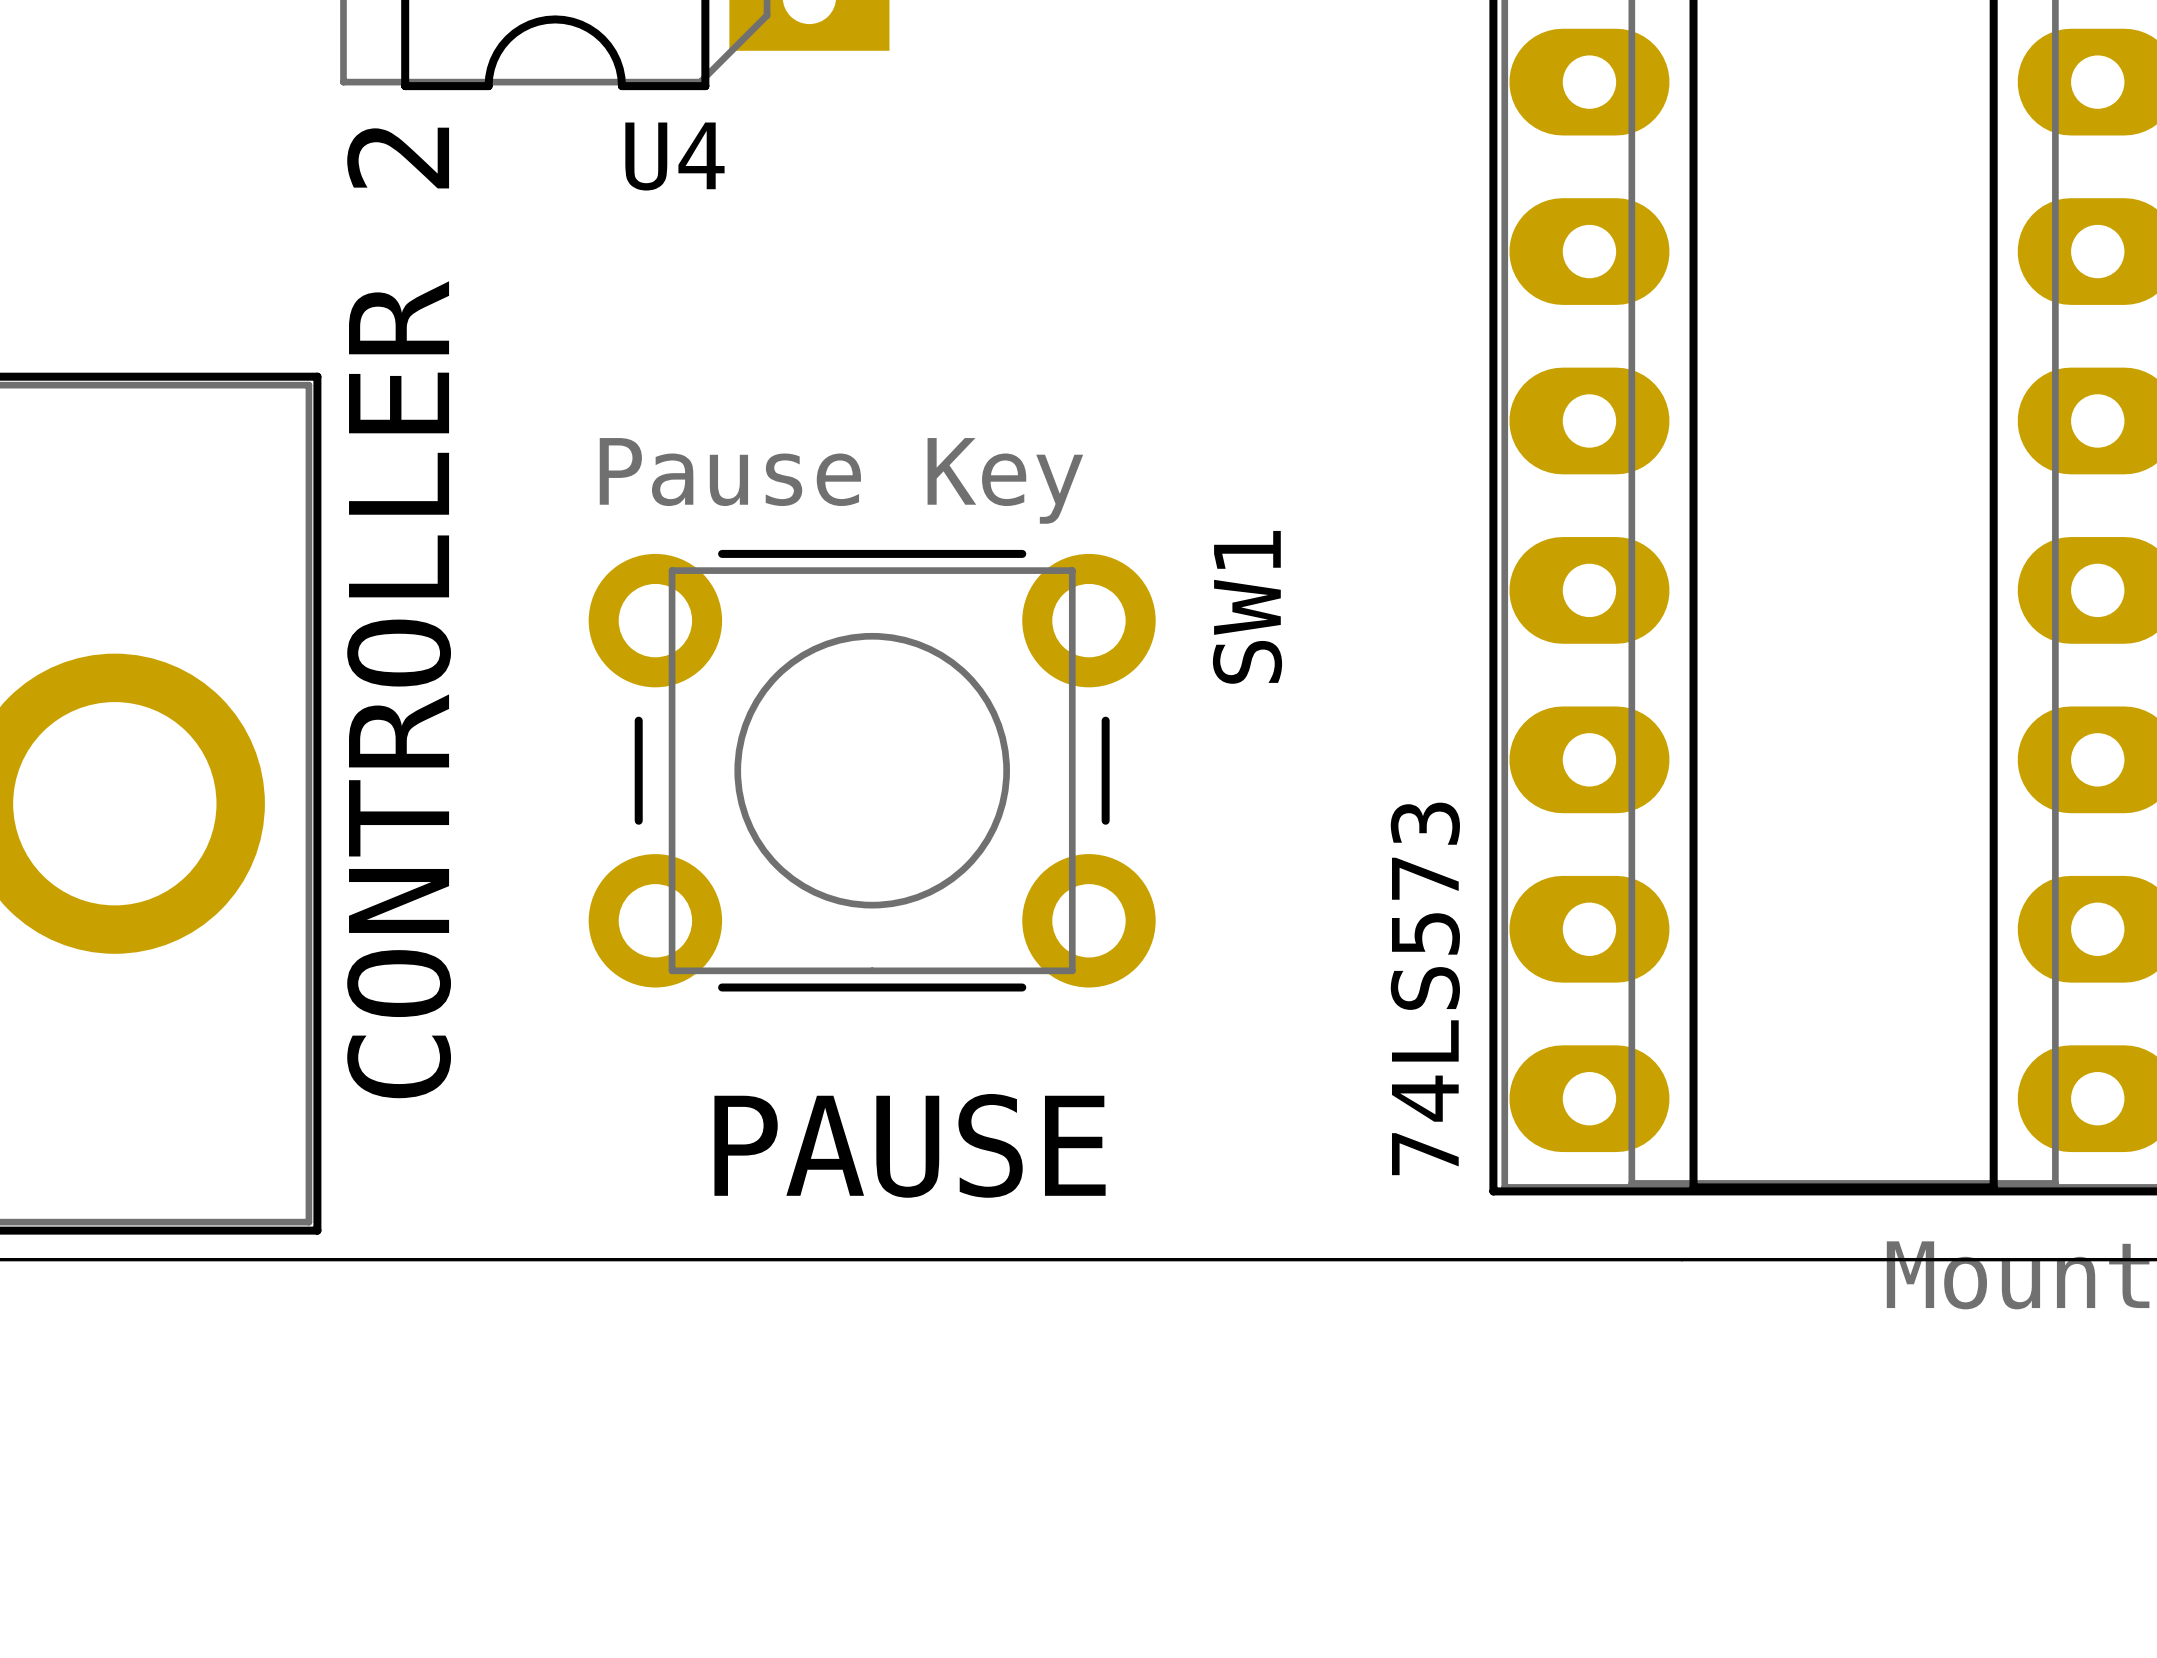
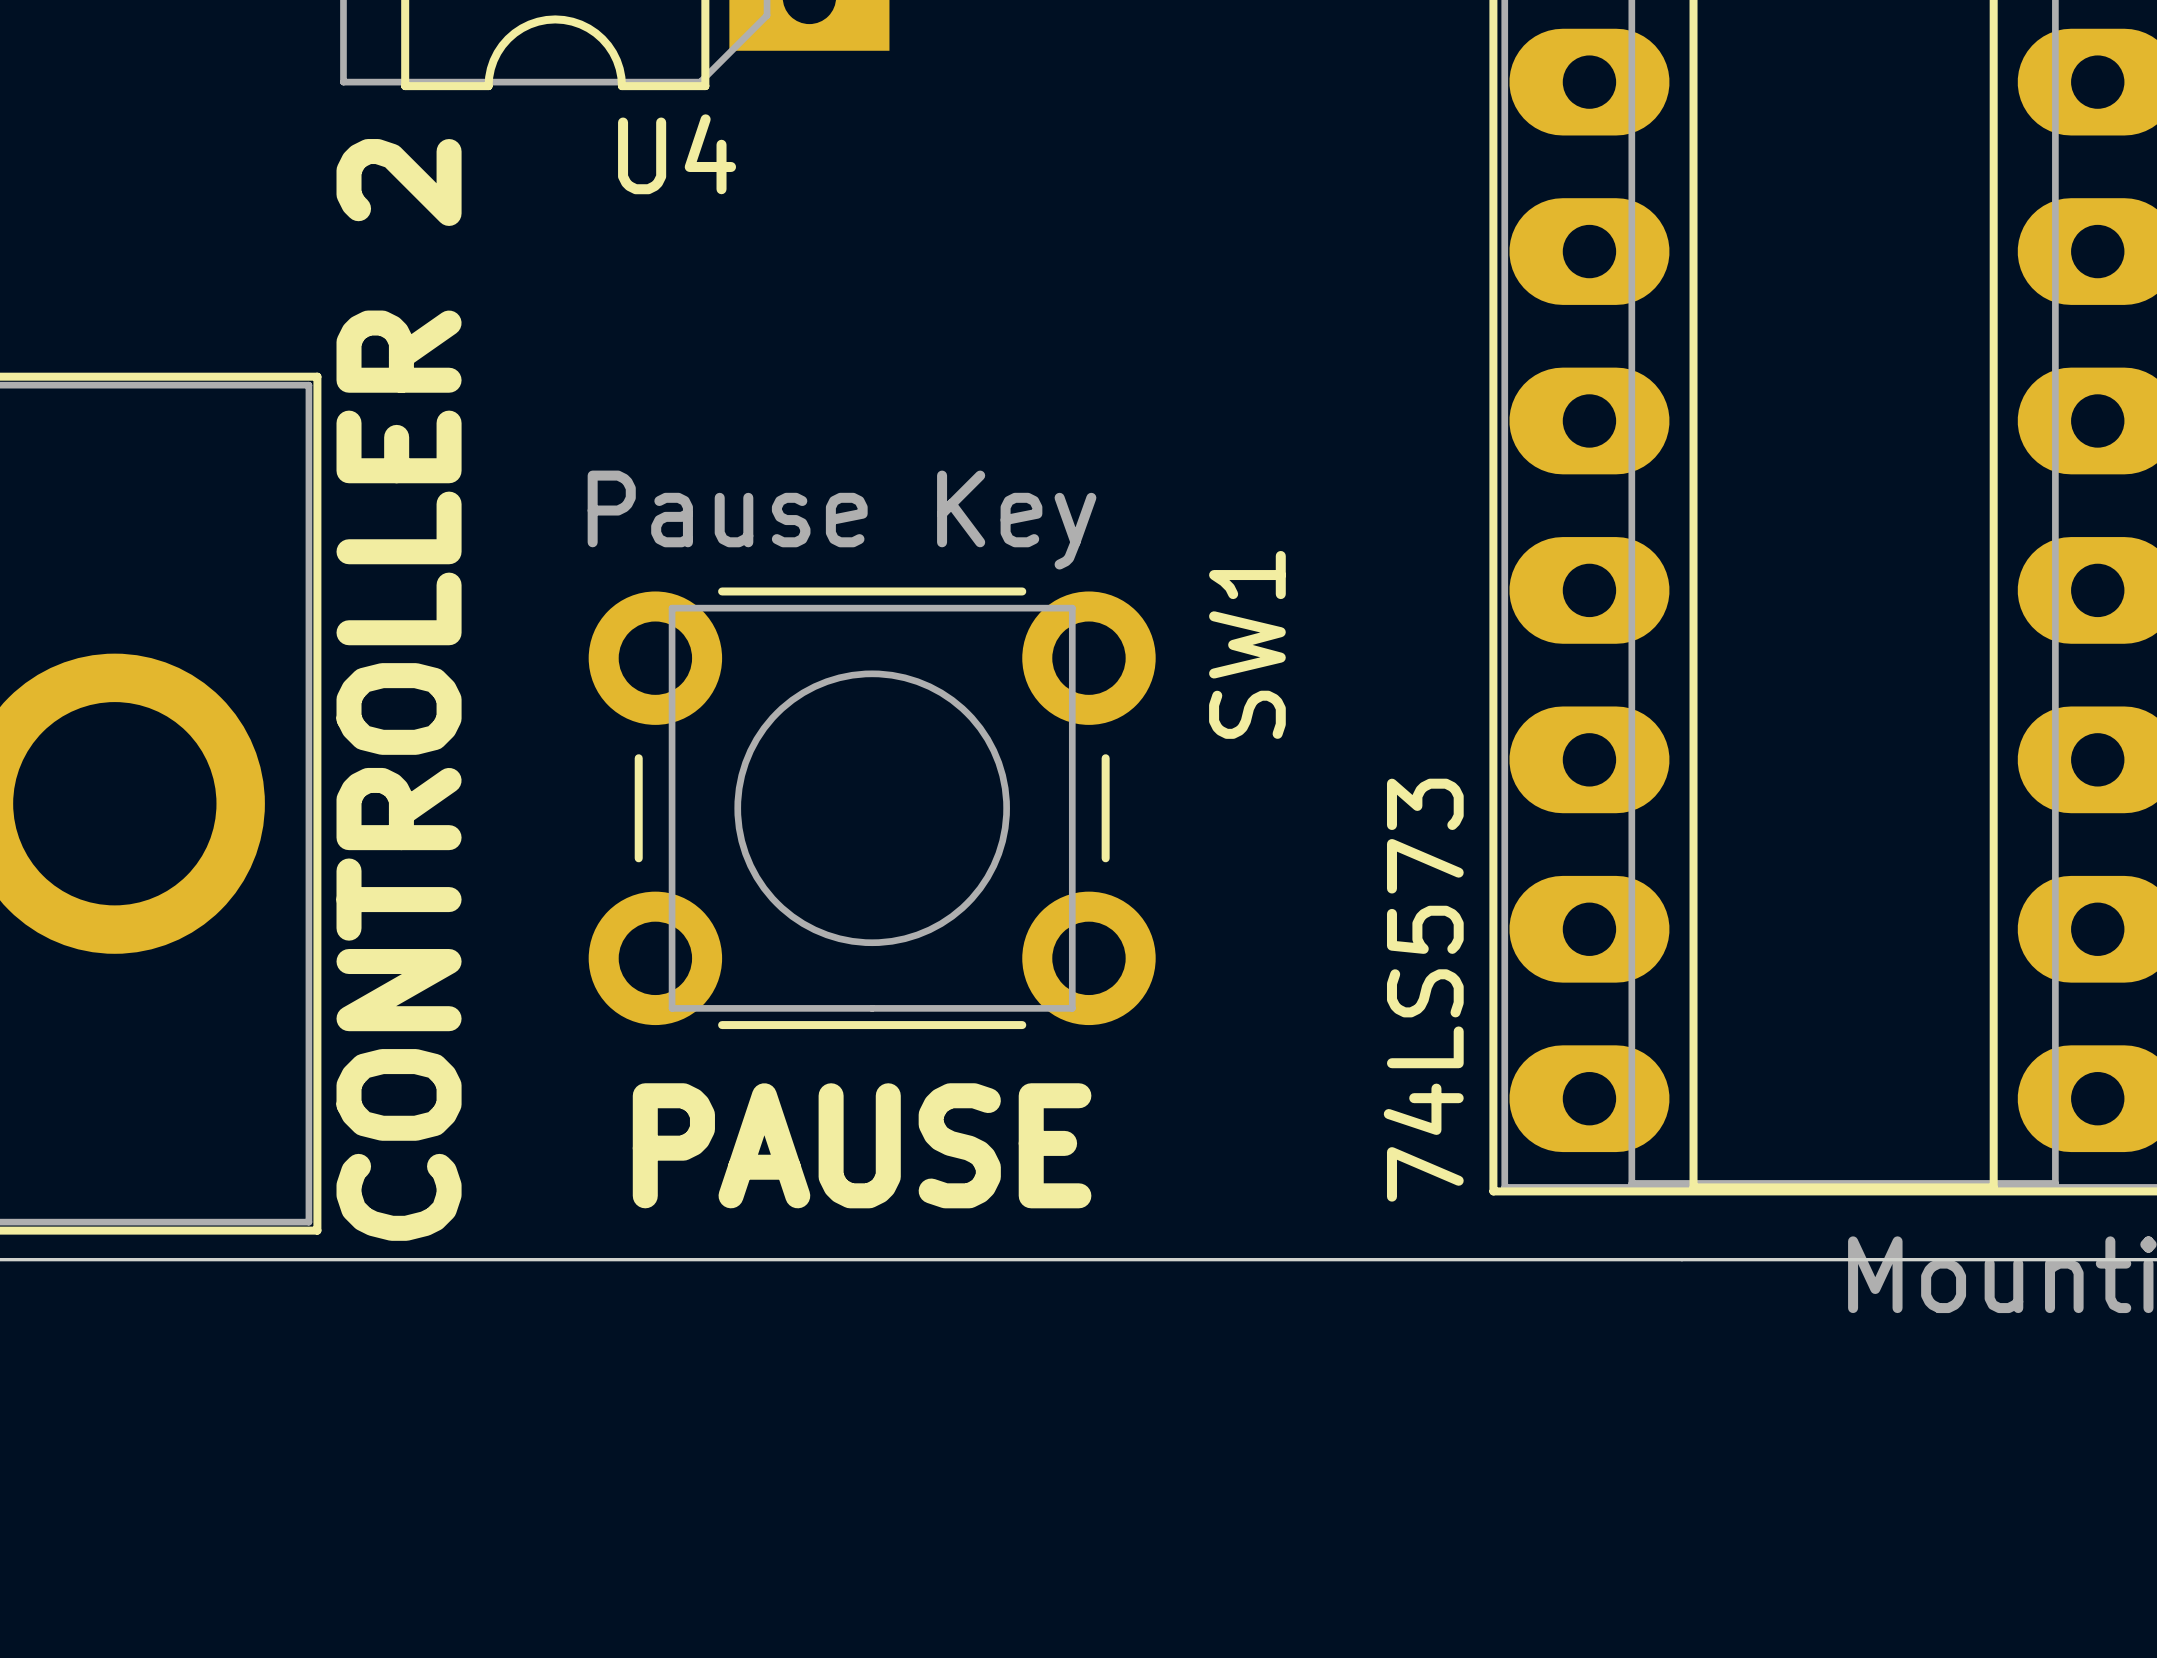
SW1 position: (872, 770) -> (872, 808)

